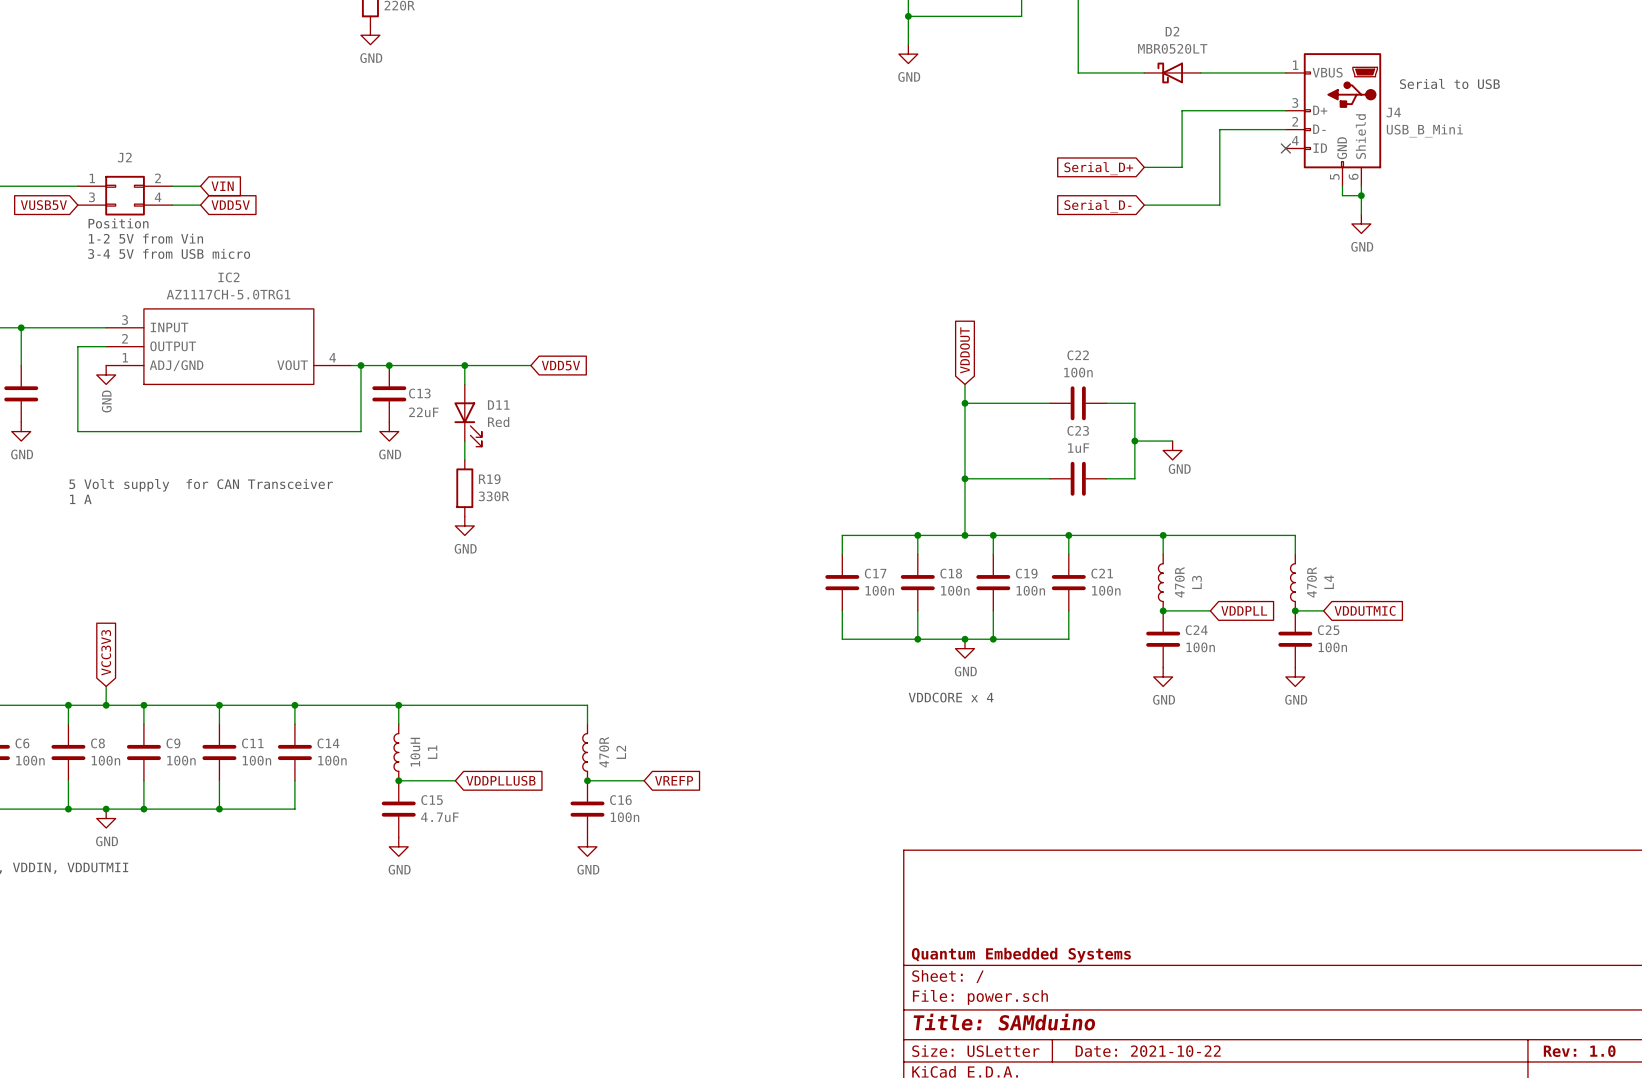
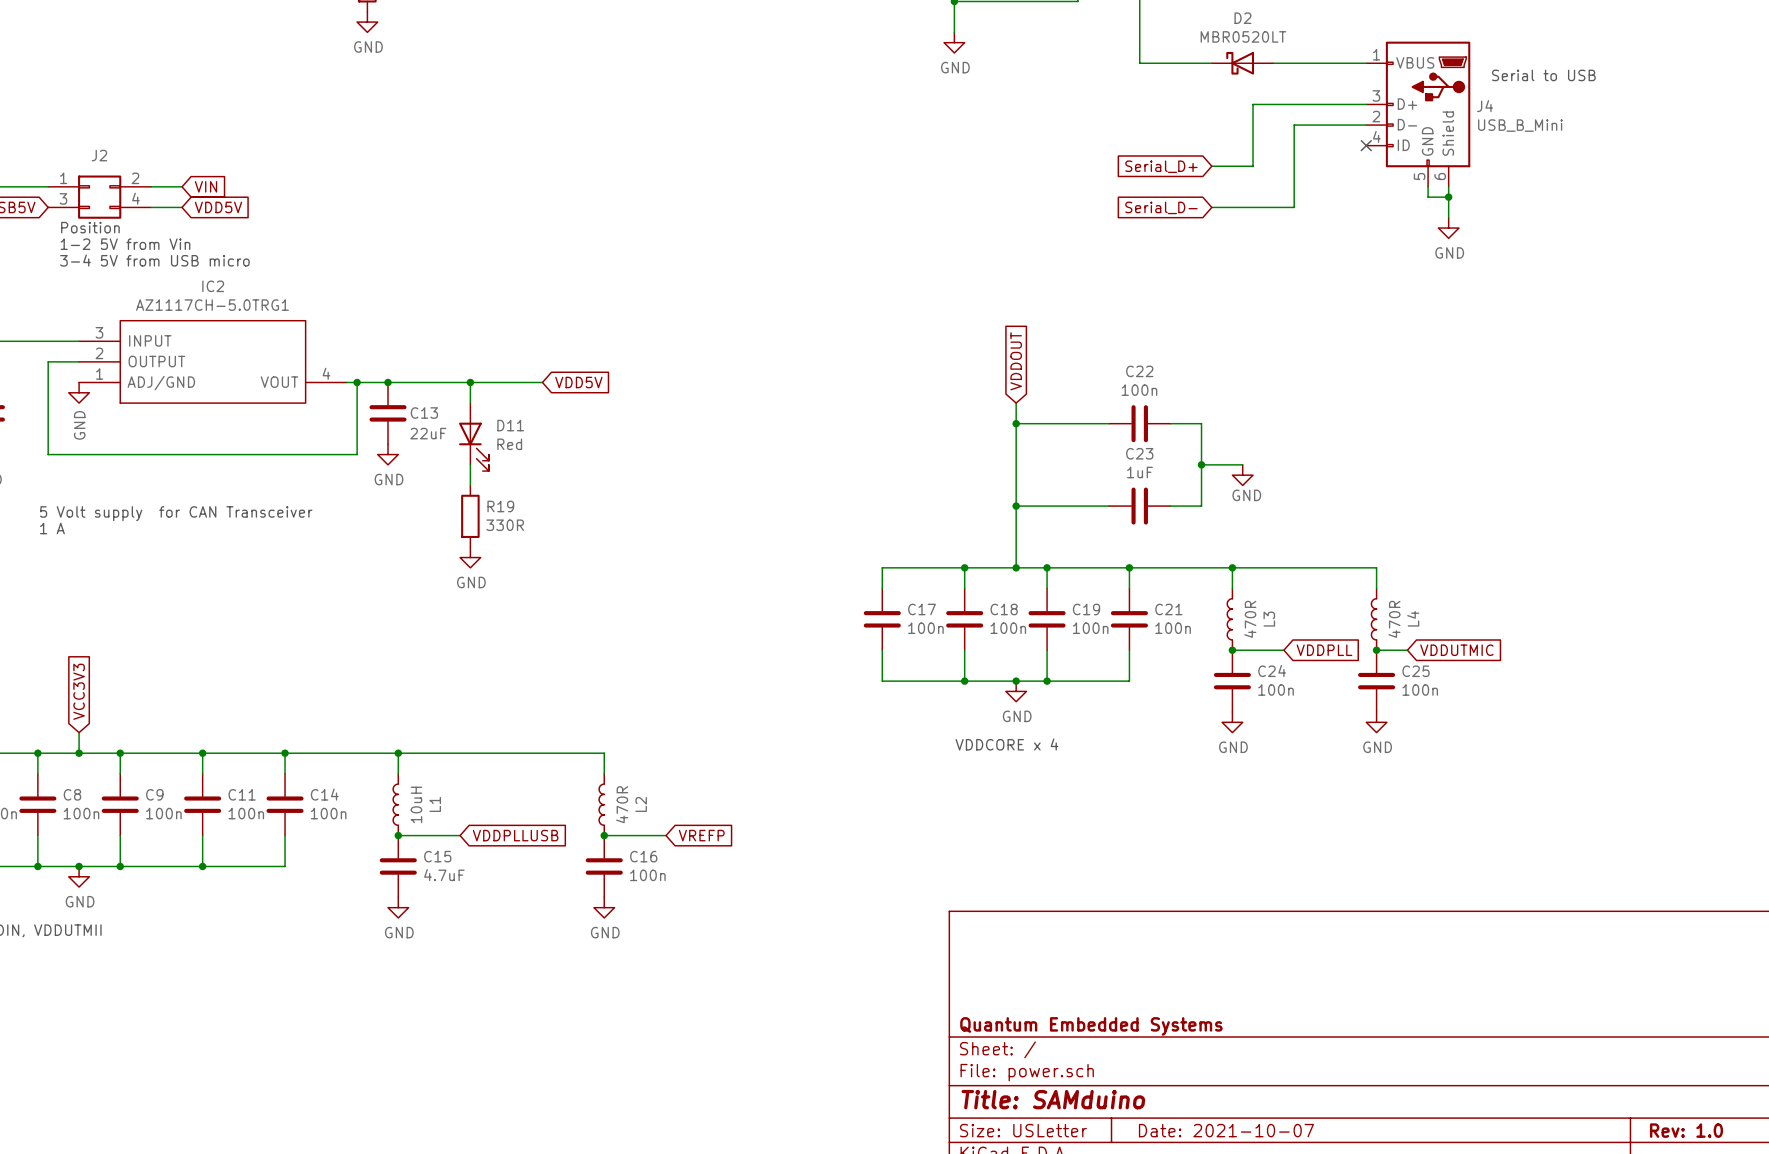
title block: Date: 2021-10-22 (1148, 1051) -> Date: 2021-10-07 (1226, 1130)

